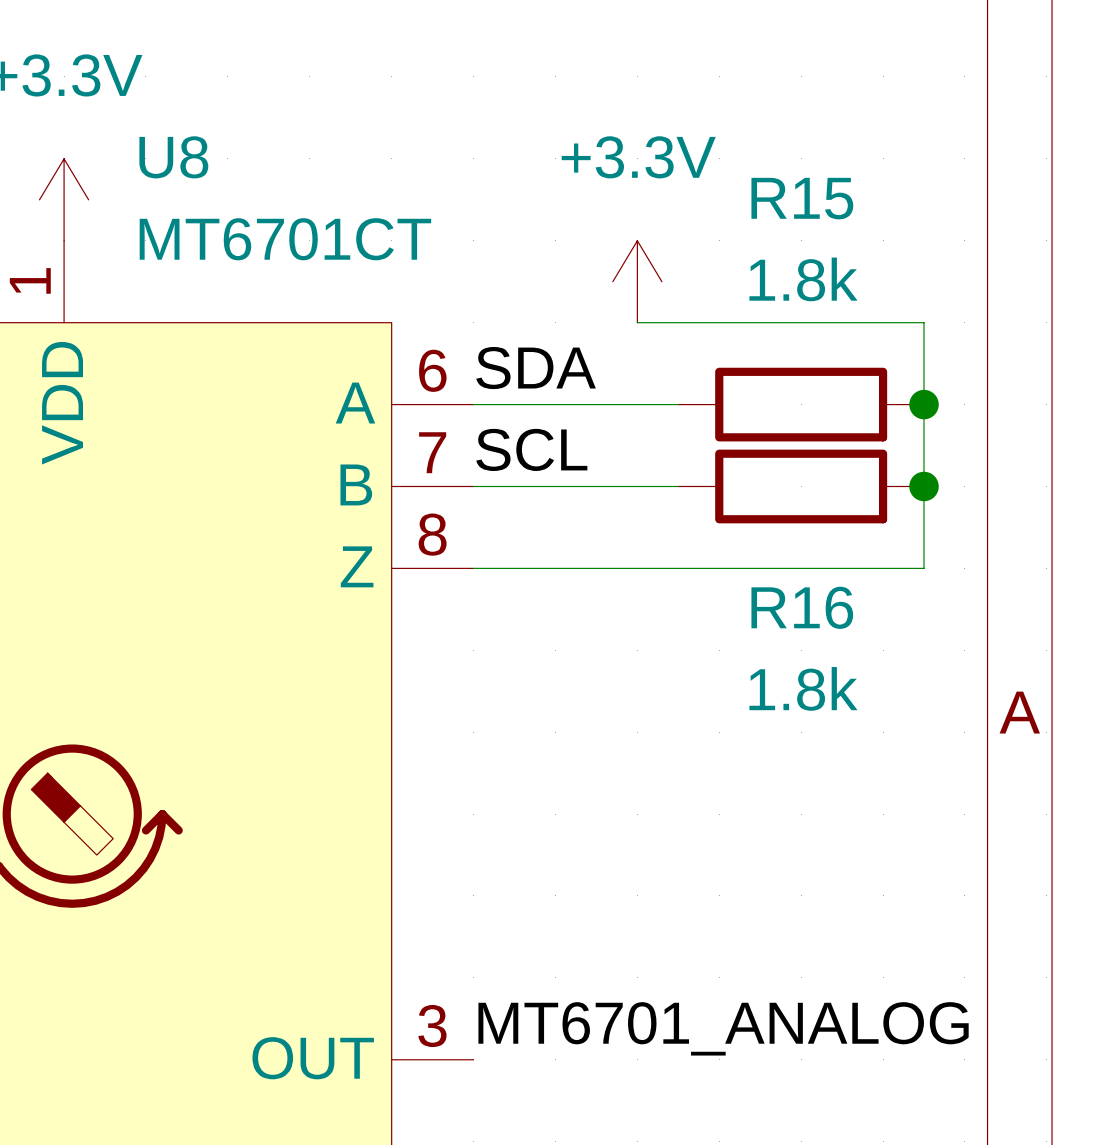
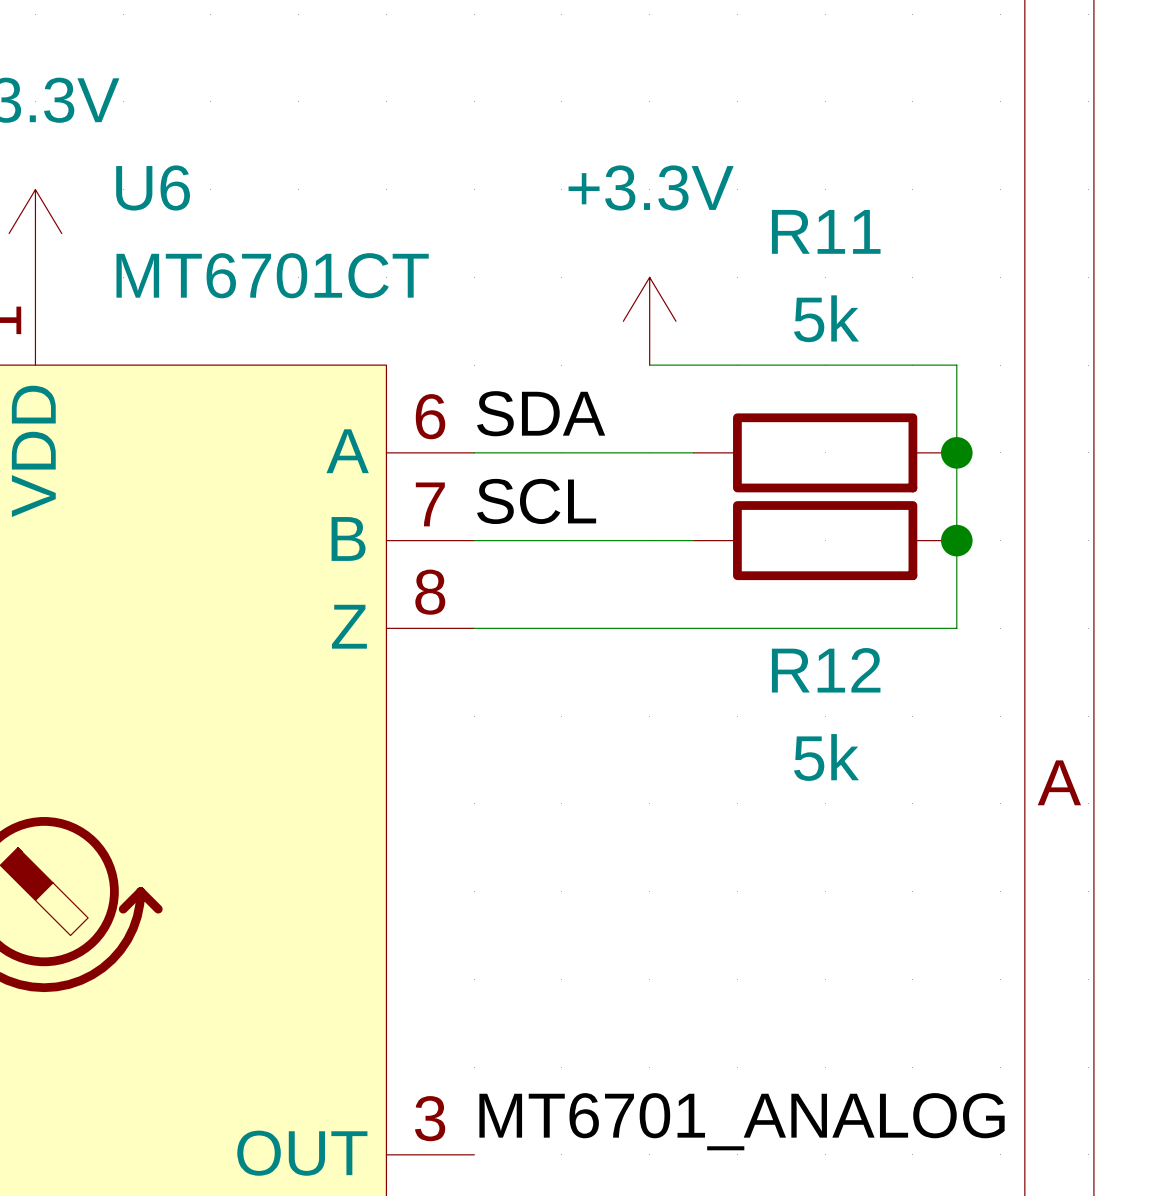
U8 name: U8 (173, 157) -> U6 (153, 187)
R15 name: R15 (802, 198) -> R11 (826, 231)
R15 value: 1.8k (803, 279) -> 5k (826, 318)
R16 name: R16 (802, 607) -> R12 (826, 670)
R16 value: 1.8k (803, 688) -> 5k (826, 757)

